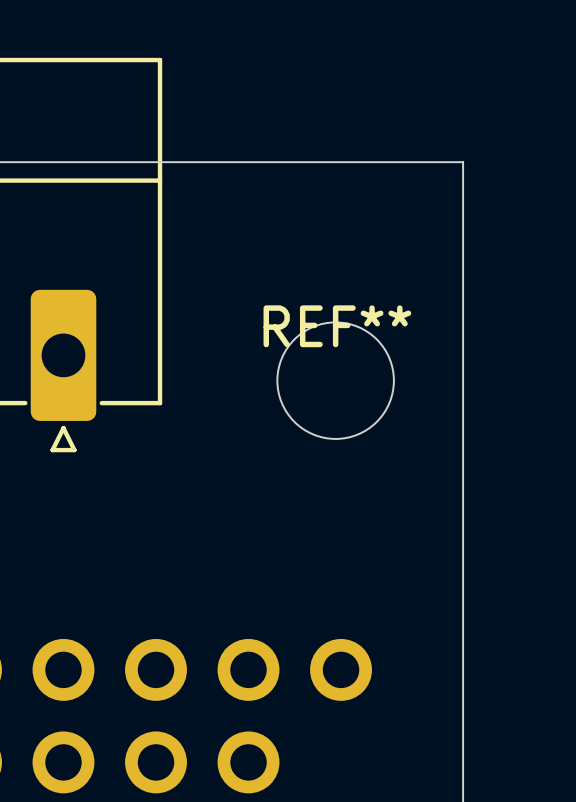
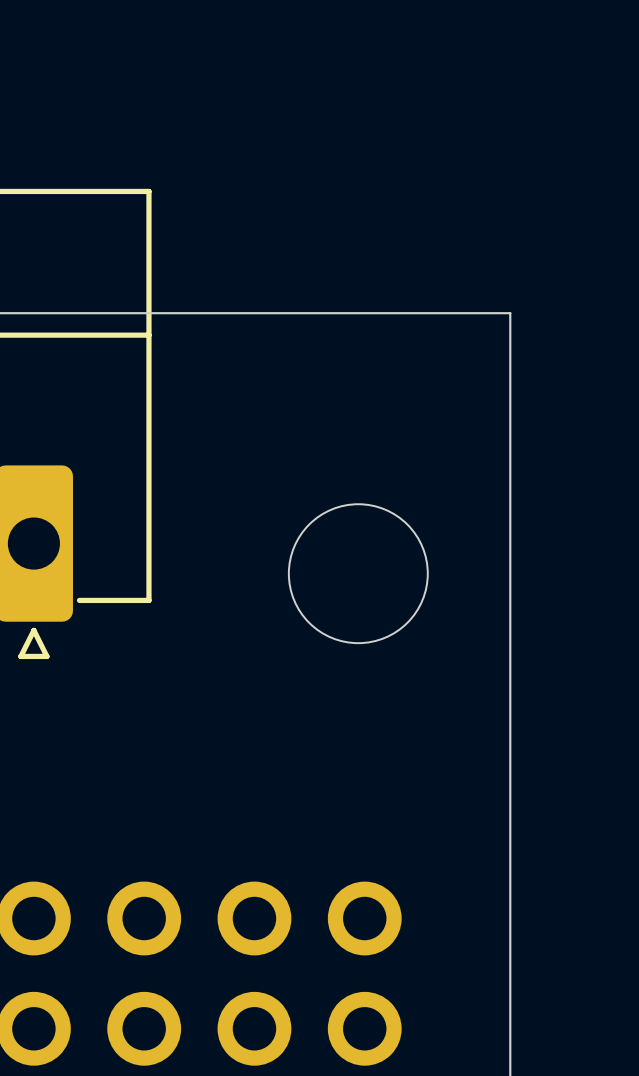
REF** name: REF** (337, 326) -> none
part: none -> (364, 1028)

